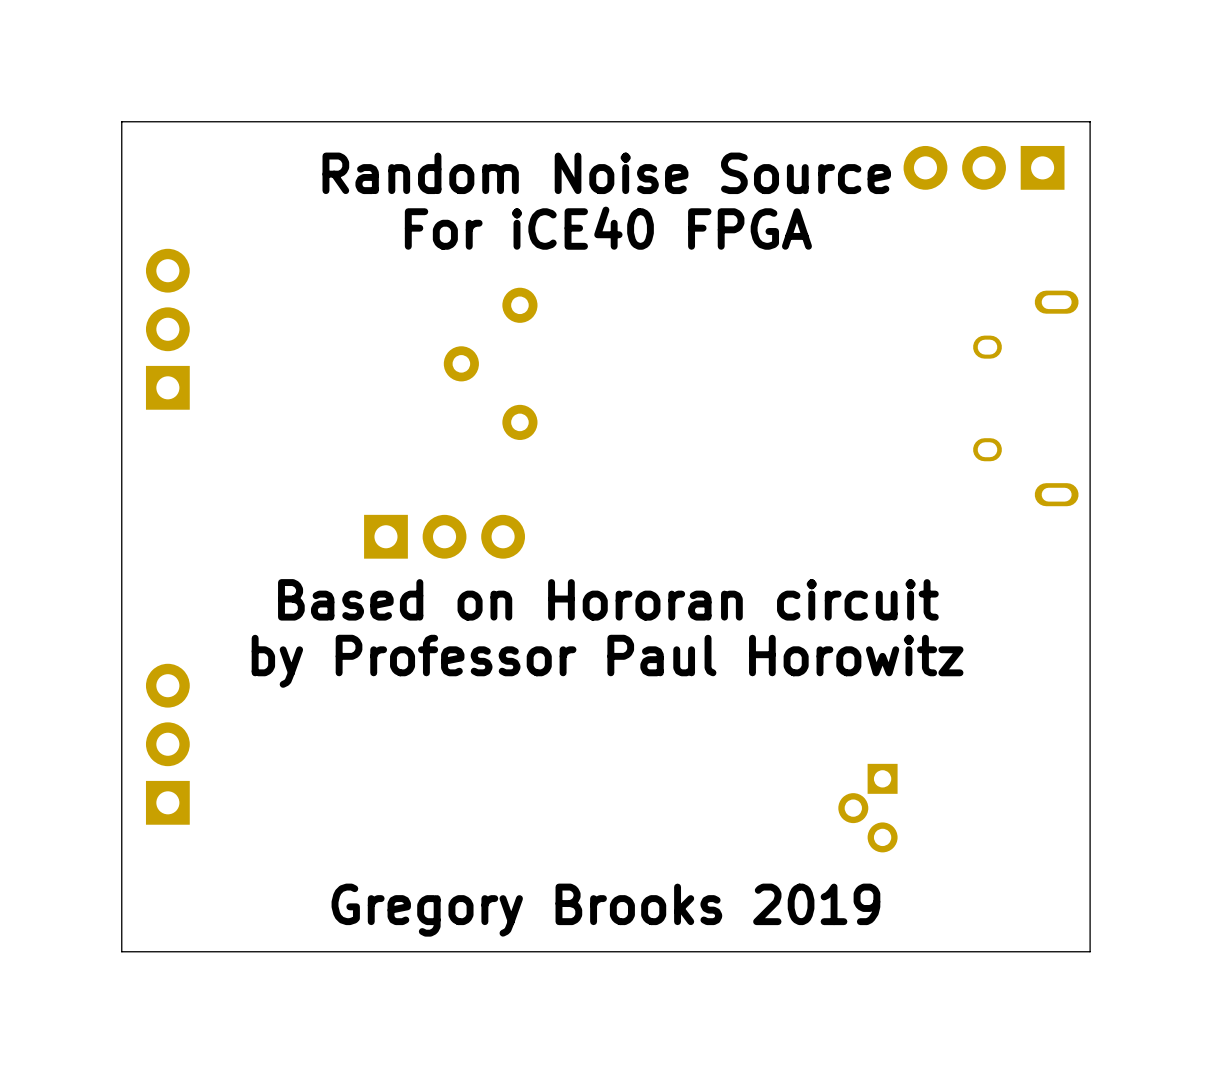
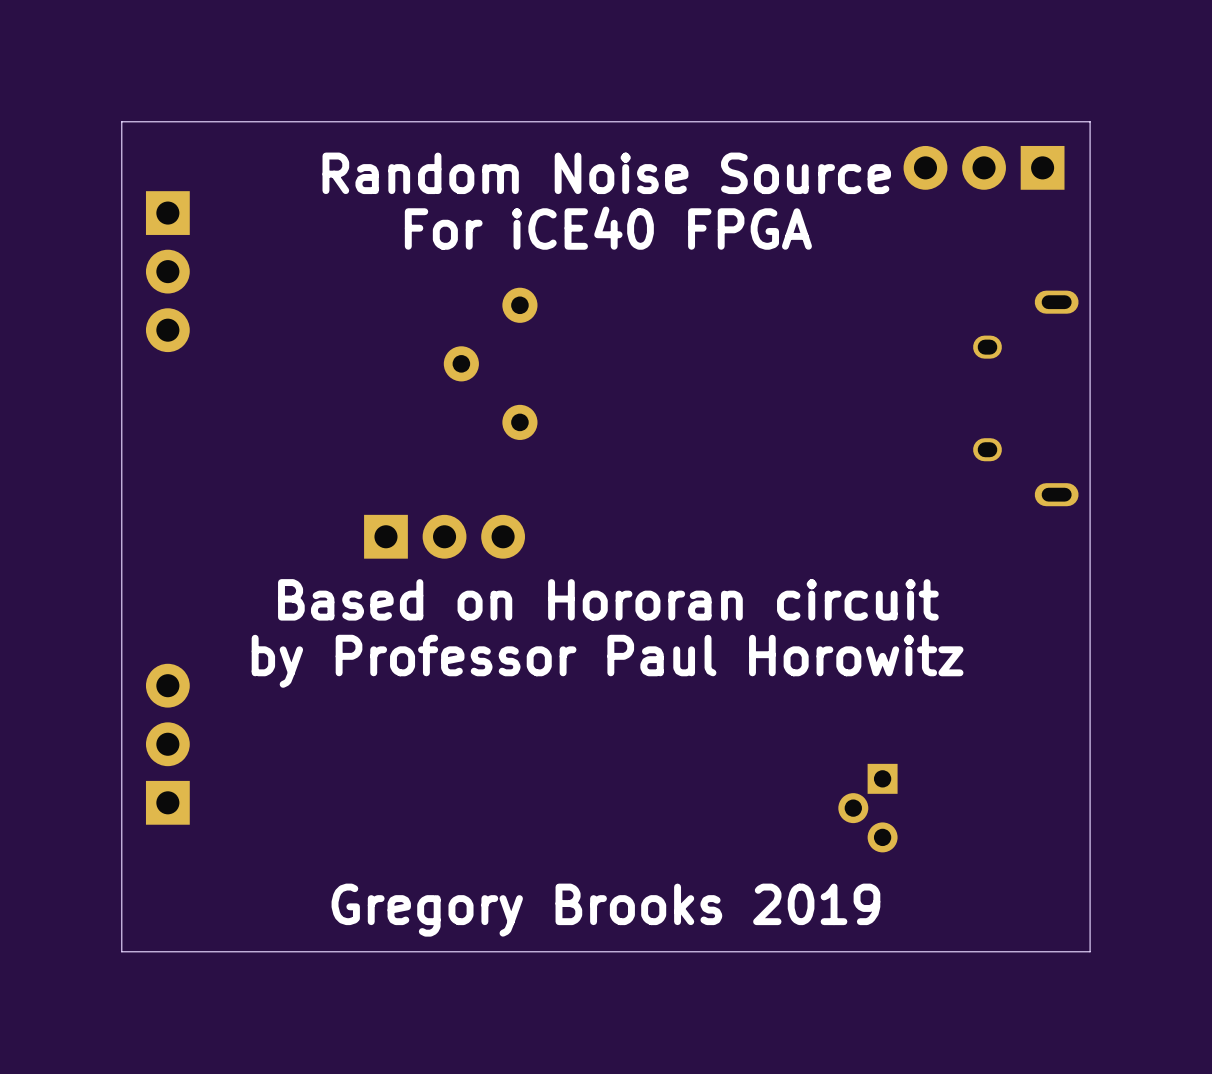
part rotation: 0° (167, 329) -> 180° (167, 271)

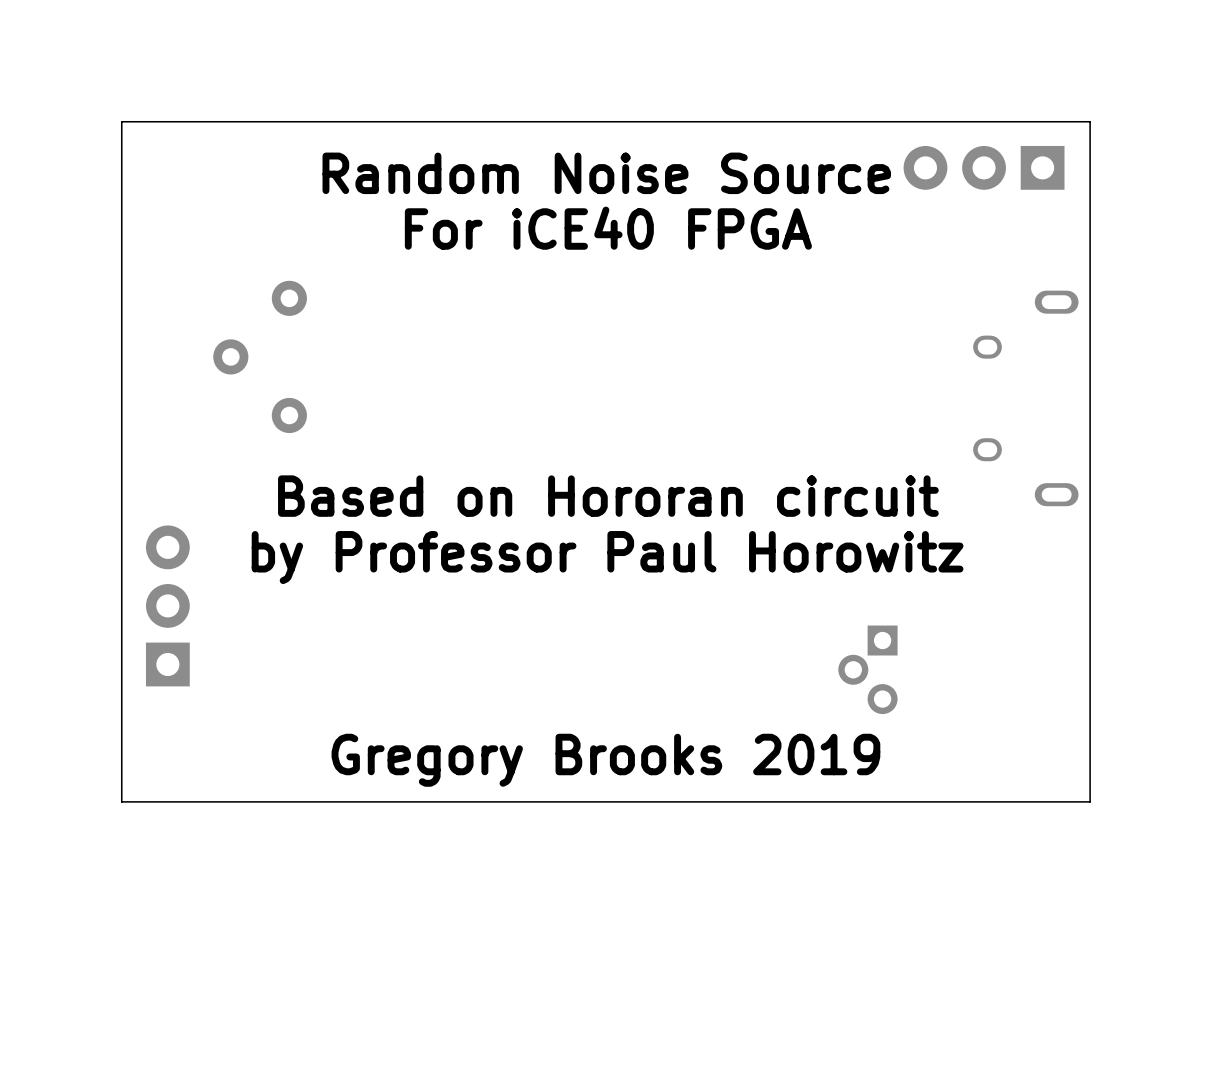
part: (167, 271) -> none
part position: (490, 363) -> (260, 356)
part: (444, 536) -> none
text position: Based on Hororan circuit (608, 599) -> Based on Hororan circuit (608, 496)
text position: by Professor Paul Horowitz (607, 661) -> by Professor Paul Horowitz (607, 557)
part position: (167, 744) -> (167, 605)
board edge: (1090, 801) (1090, 951) (121, 951) (121, 801) -> (1090, 801) (121, 801)
part position: (867, 808) -> (867, 669)
text position: Gregory Brooks 2019 (605, 910) -> Gregory Brooks 2019 (605, 760)

